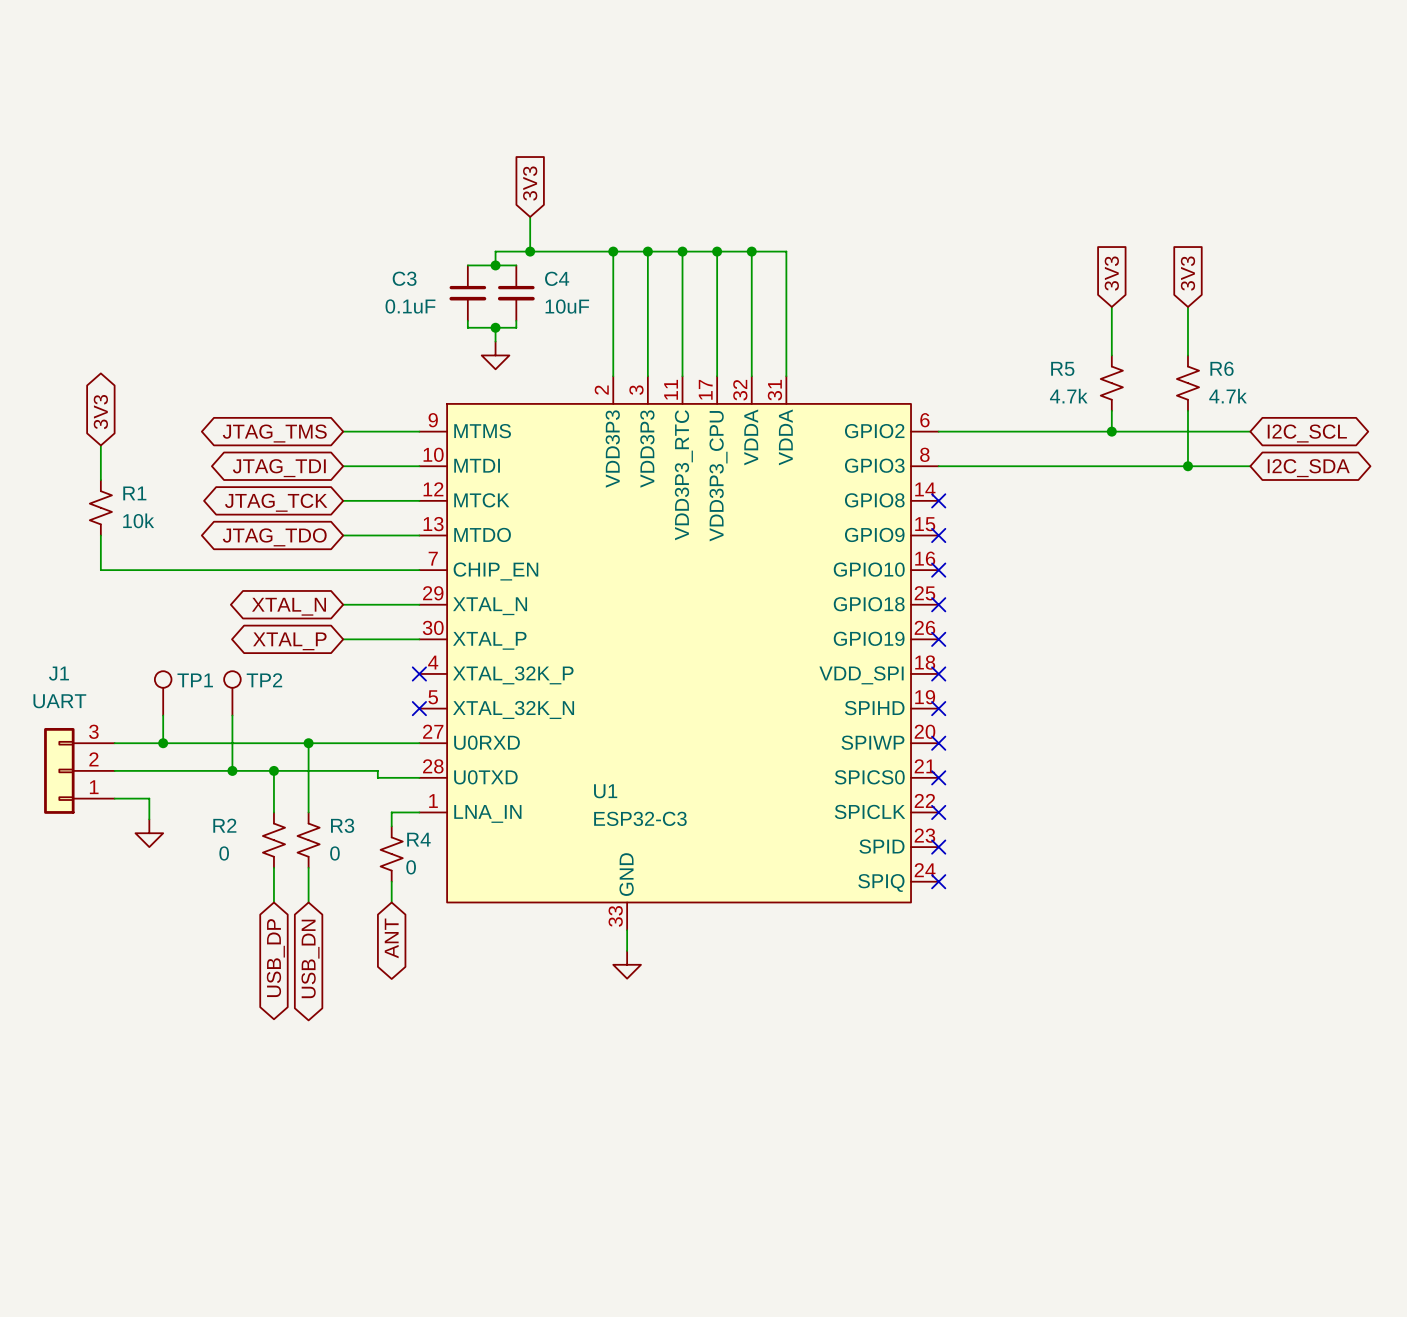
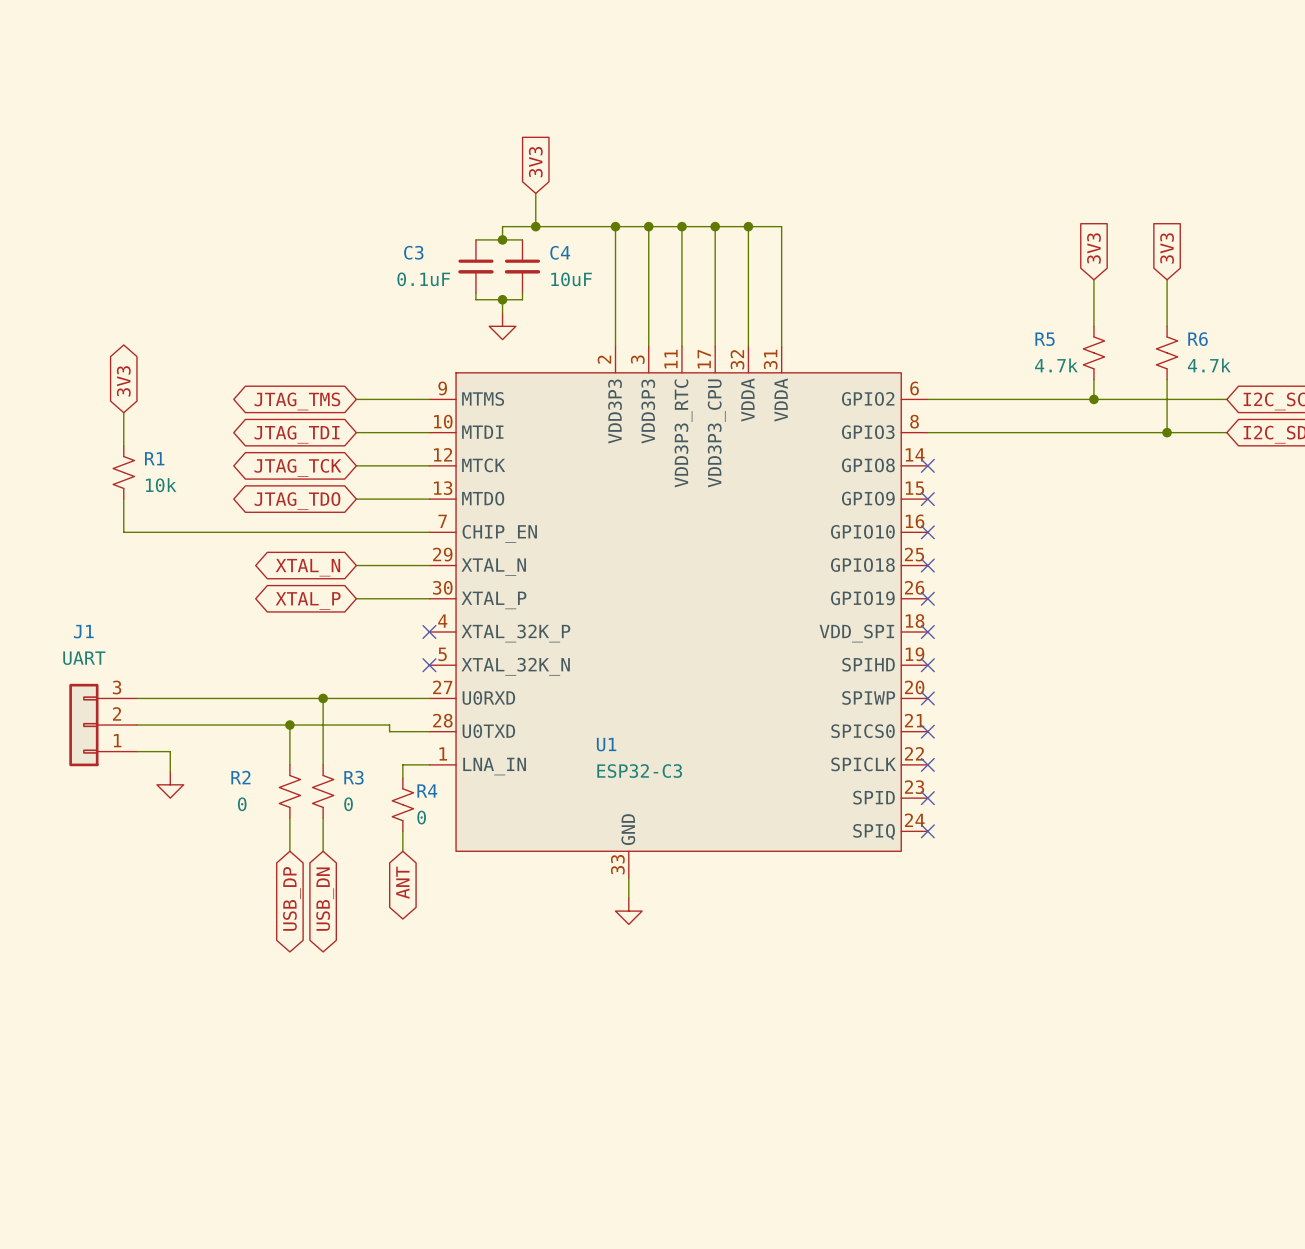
TP1: (163, 693) -> none
TP2: (232, 693) -> none
wire: (163, 715) (163, 743) -> none
wire: (232, 715) (232, 770) -> none
junction: (163, 743) -> none
junction: (232, 770) -> none

